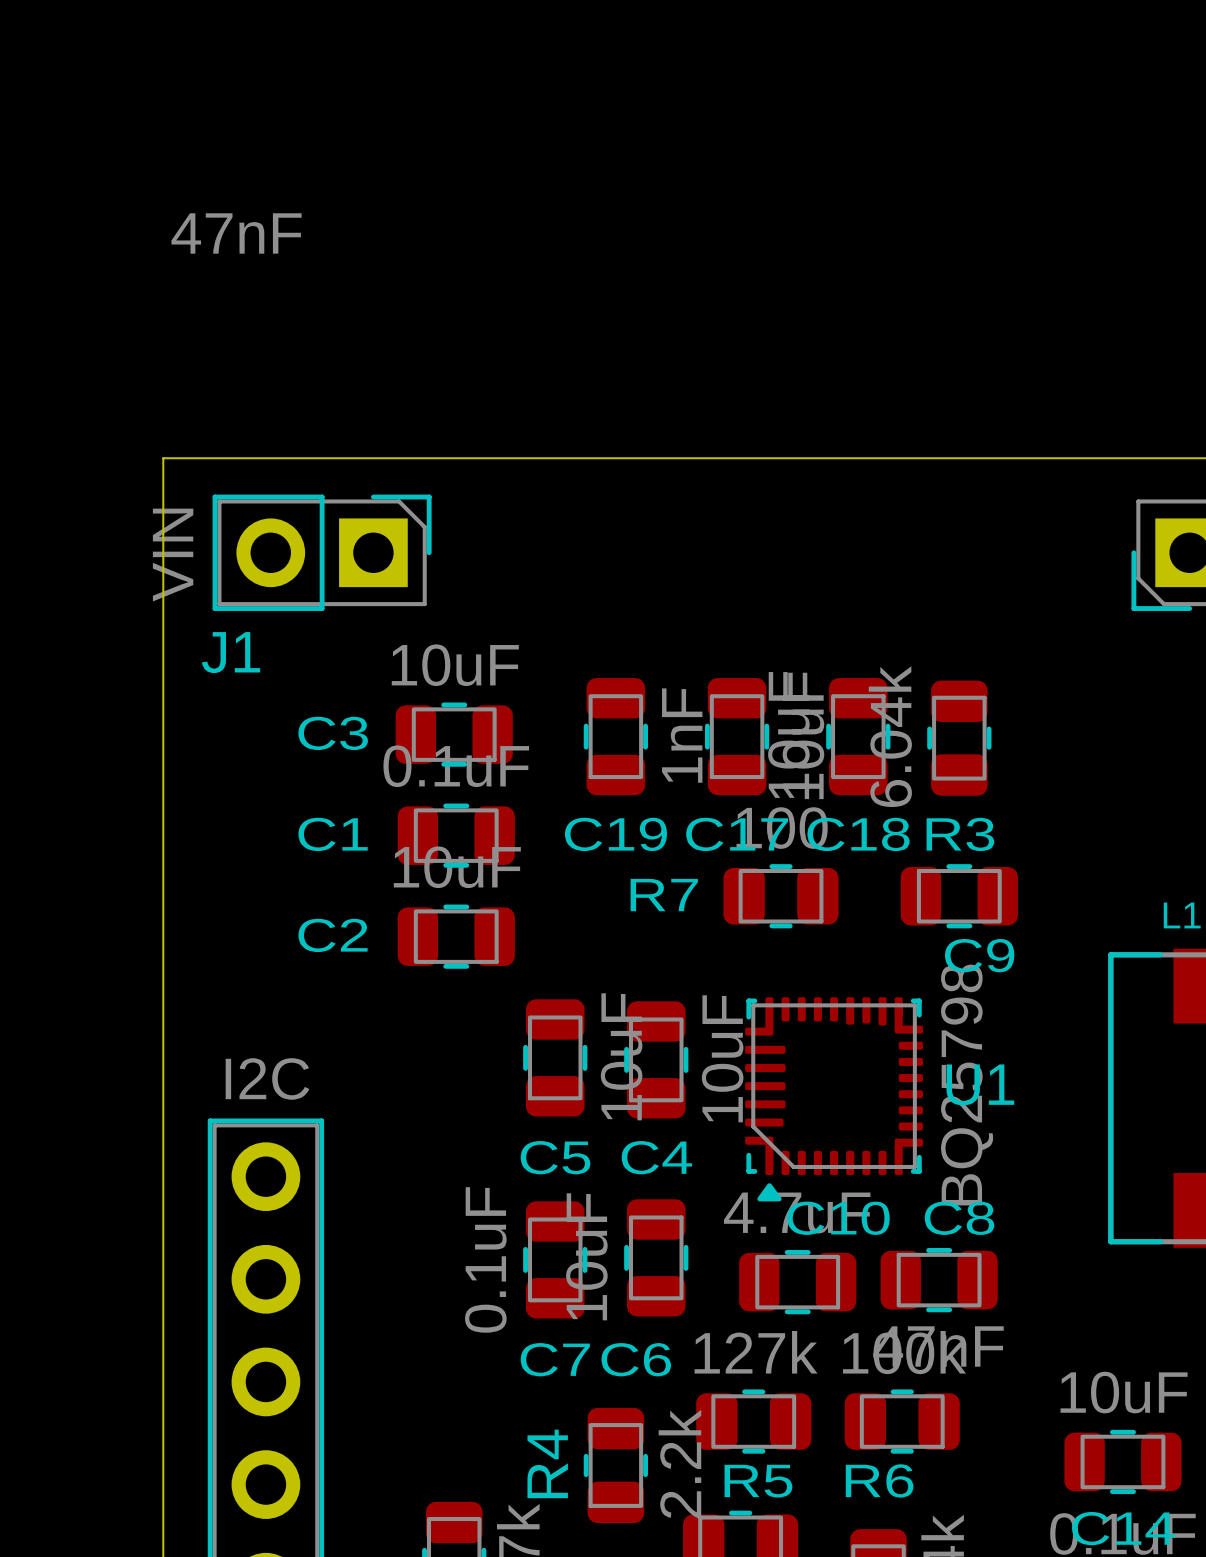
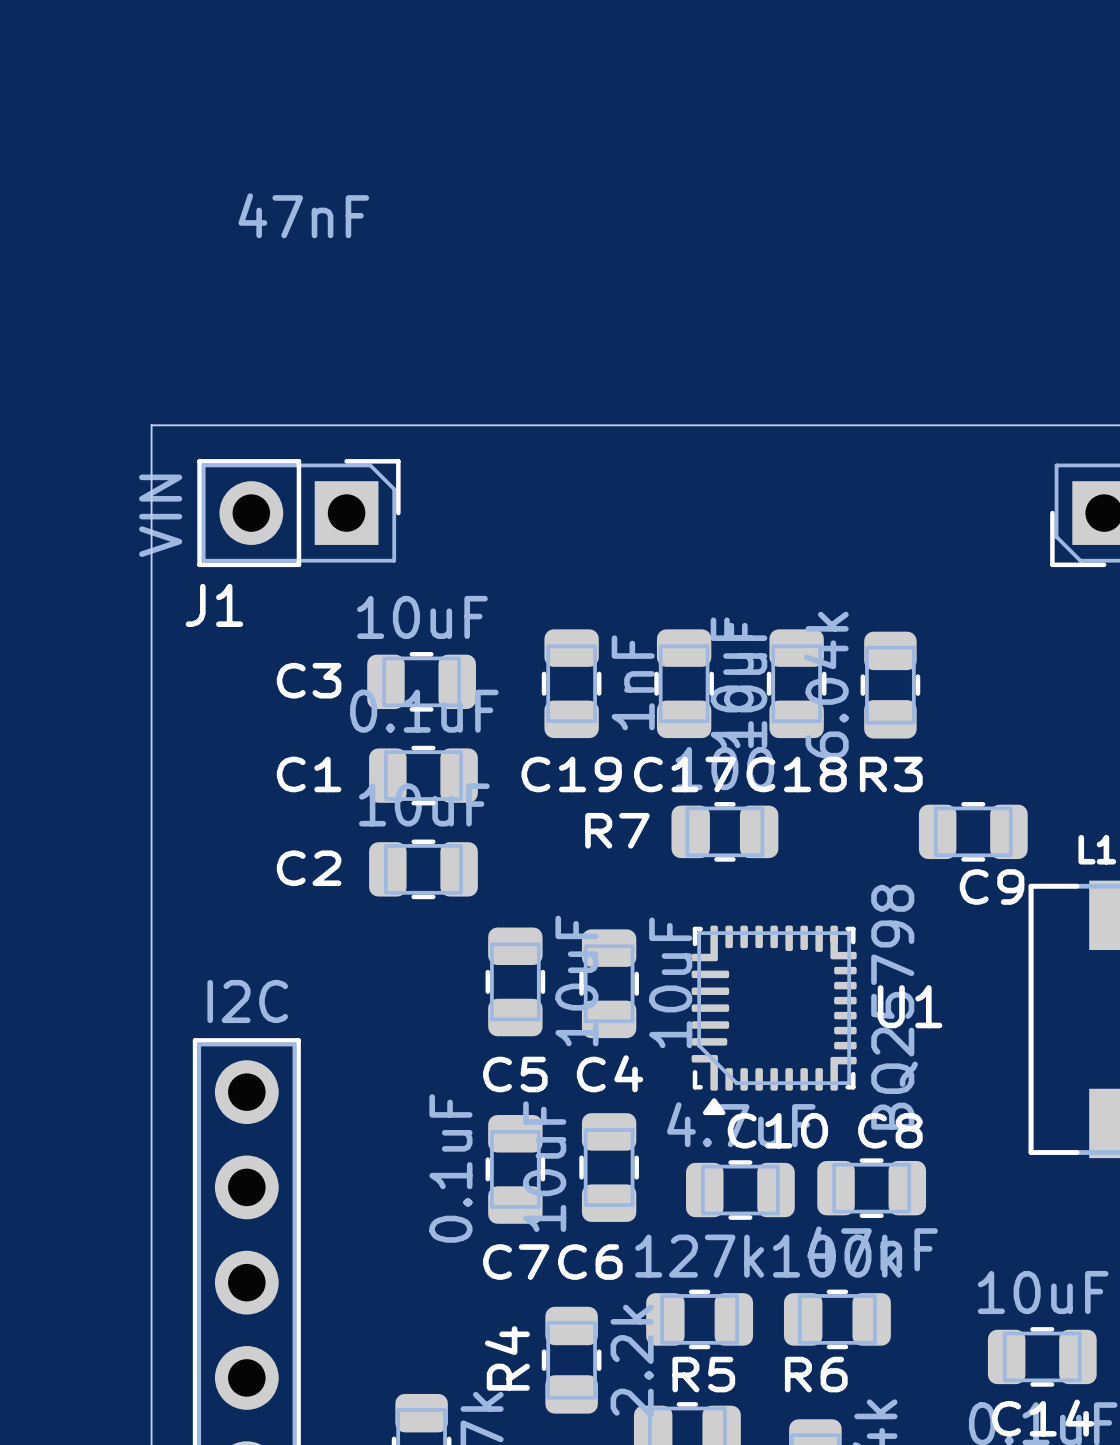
C9 position: (959, 896) -> (973, 831)

